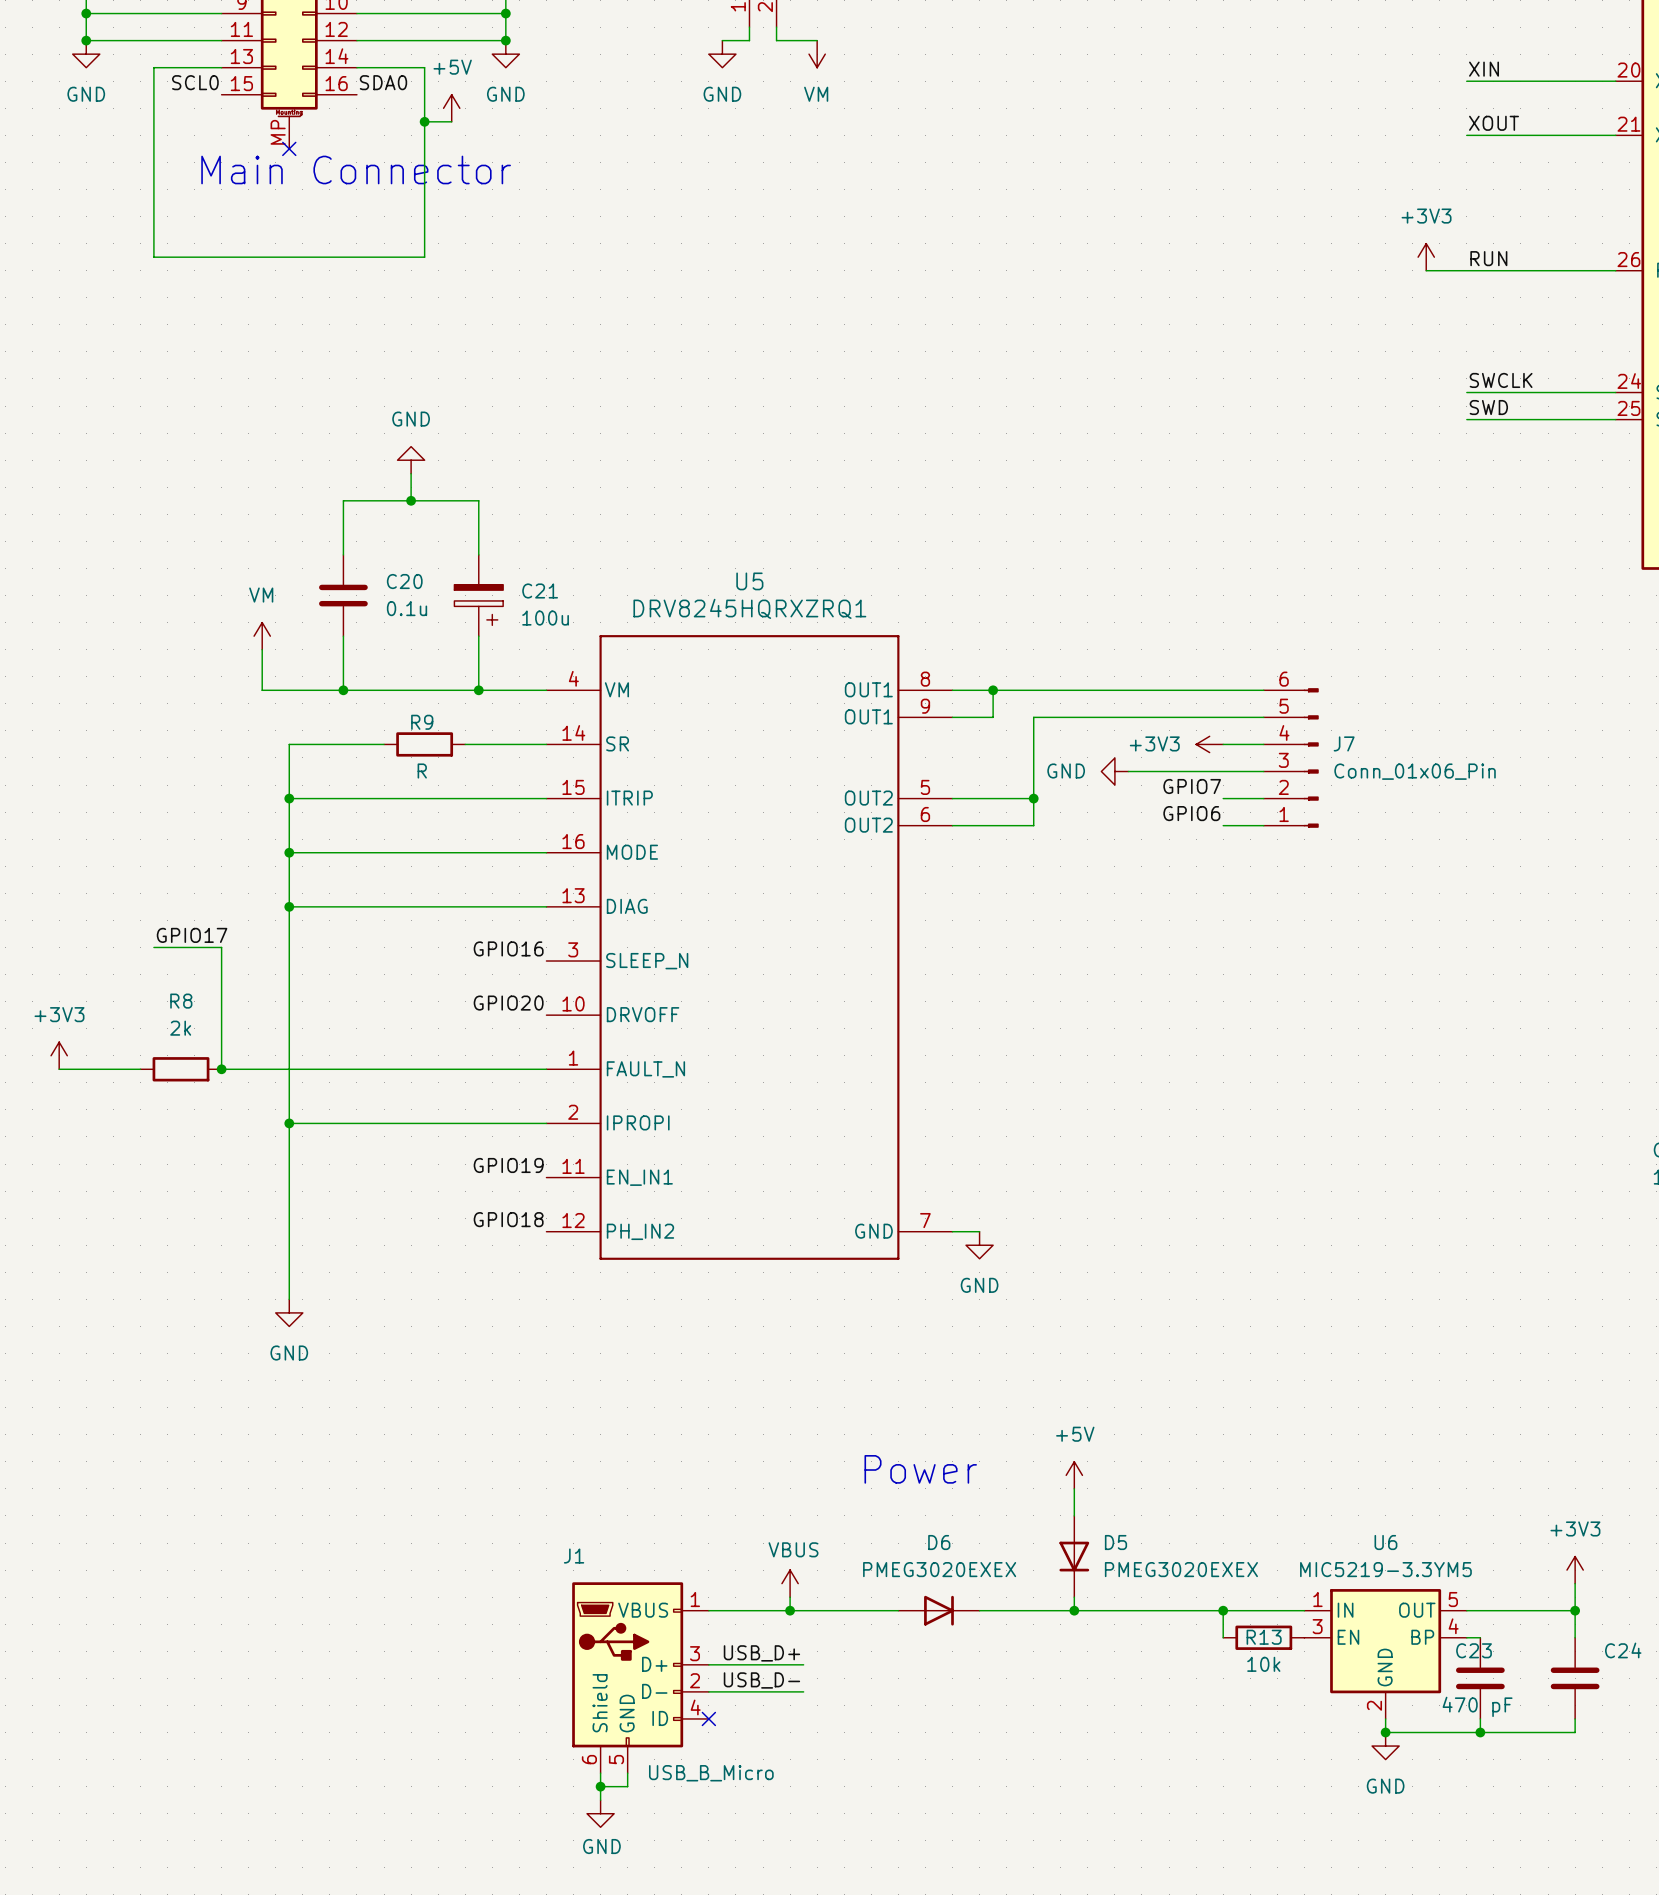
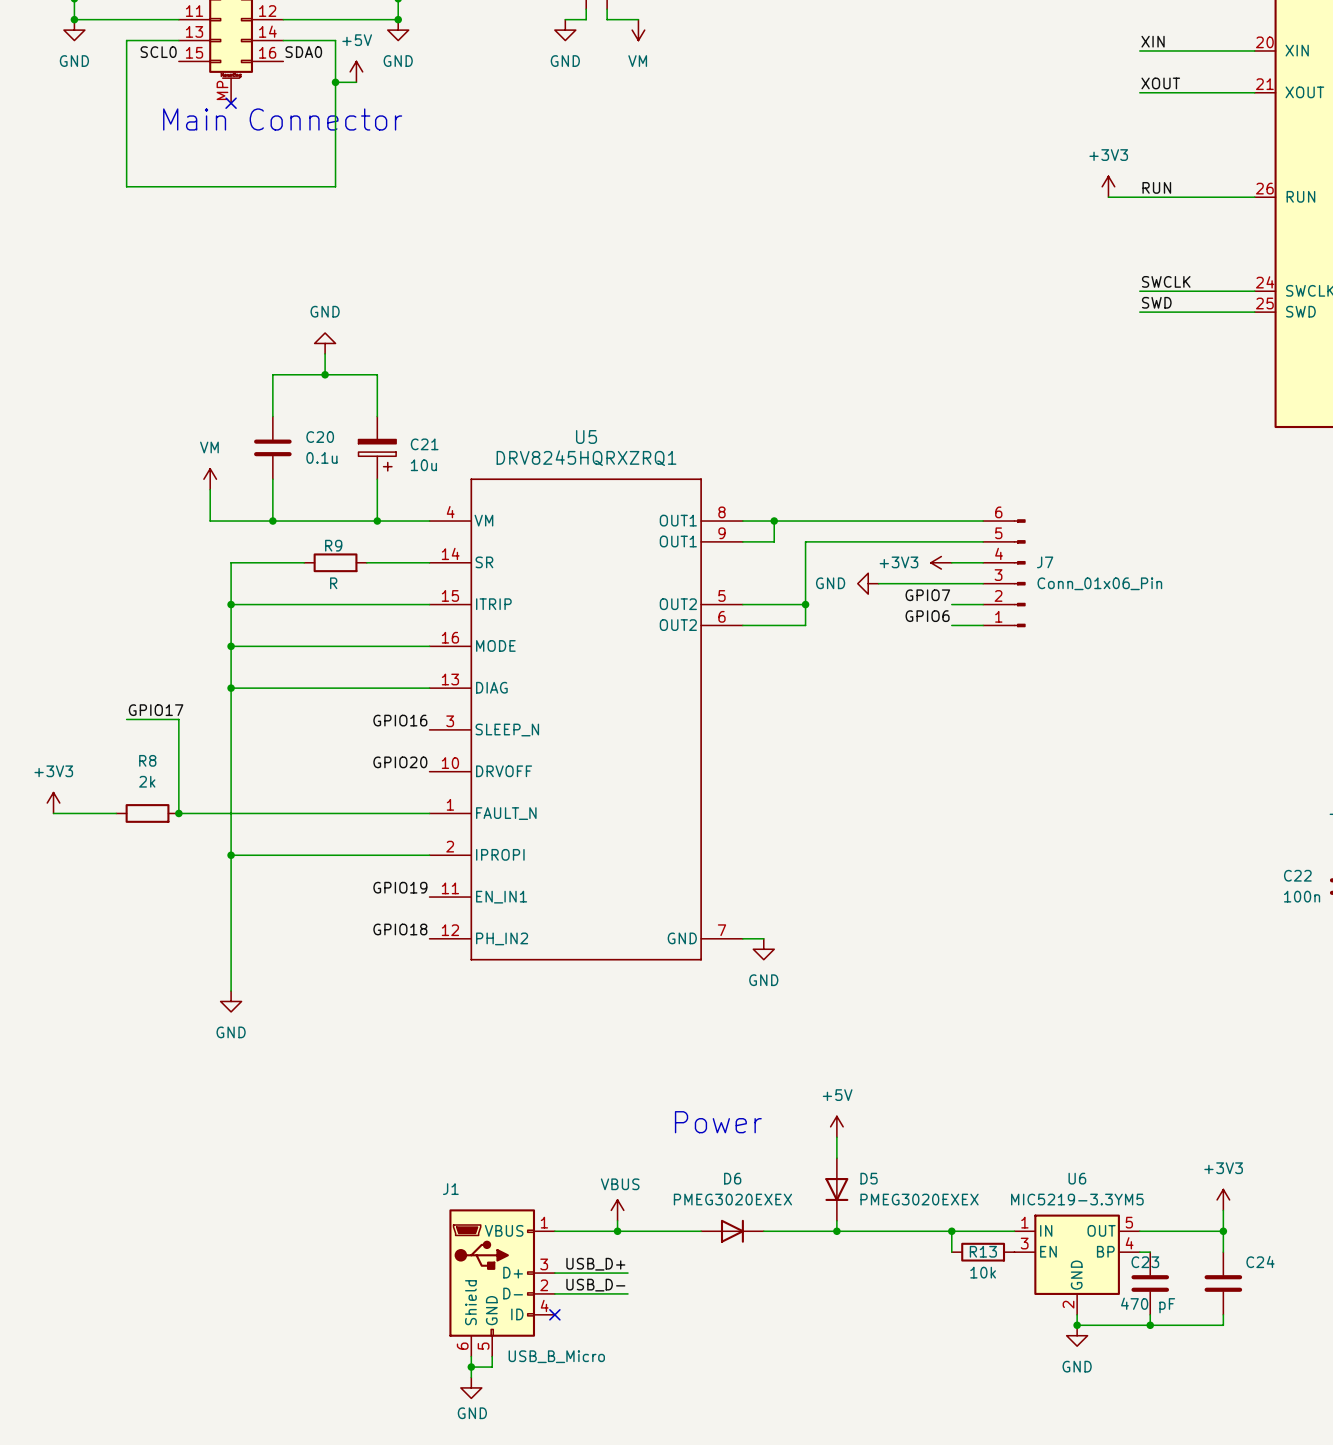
C21 value: 100u (545, 618) -> 10u (423, 465)

